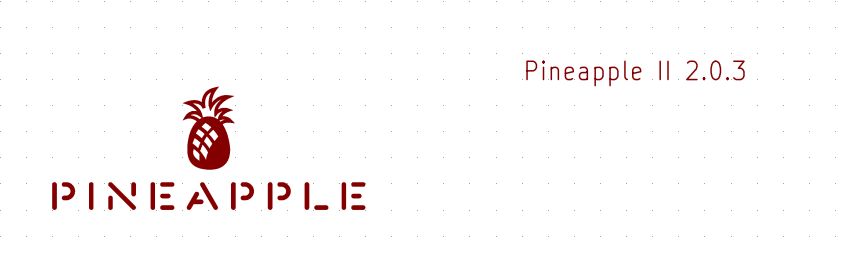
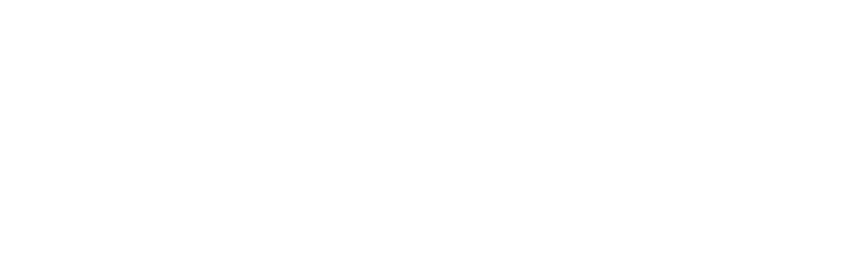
text: Pineapple II 2.0.3 (635, 73) -> none
part: (208, 148) -> none

